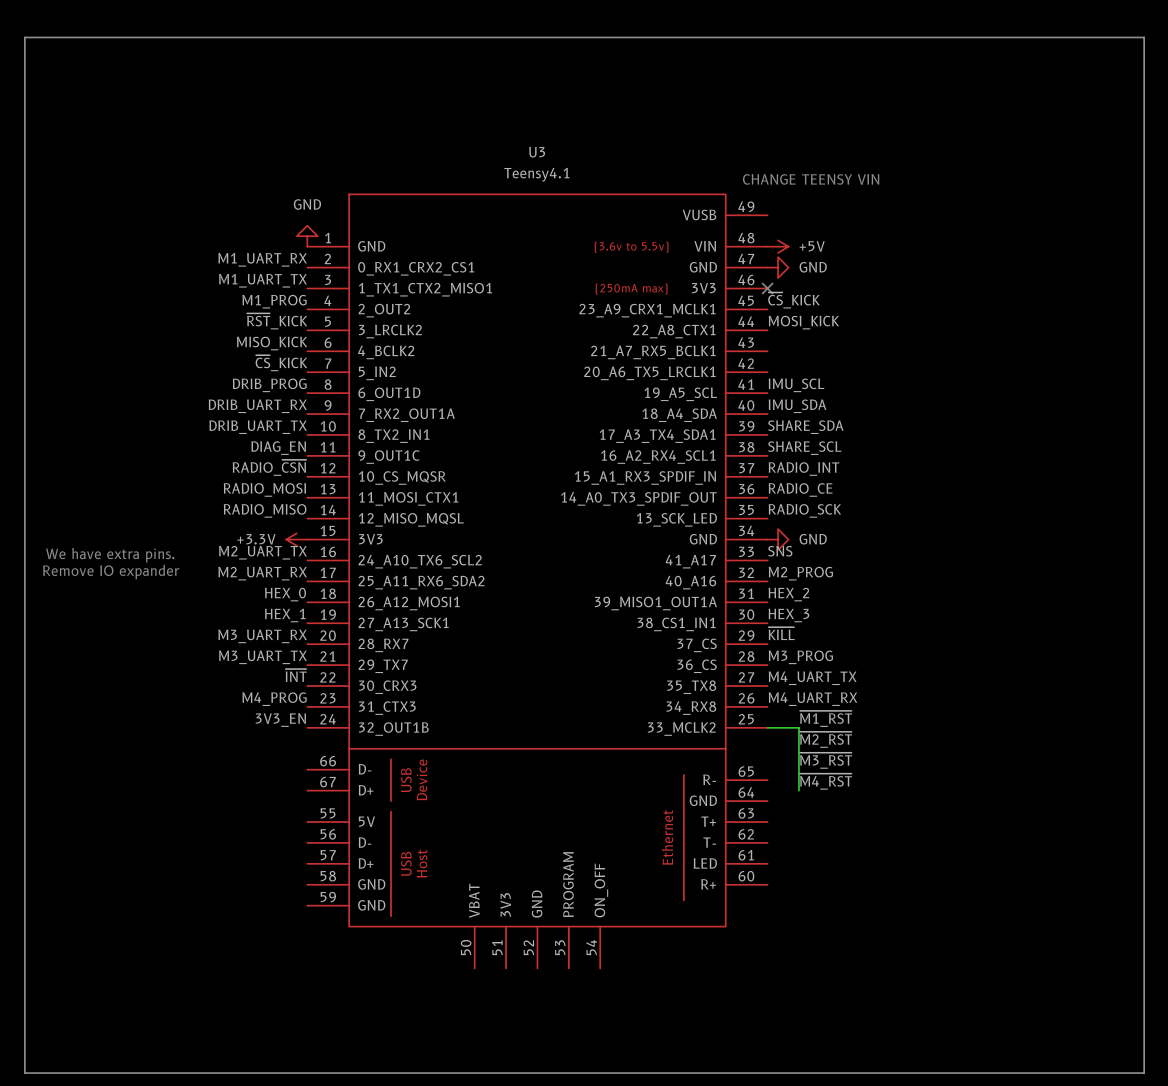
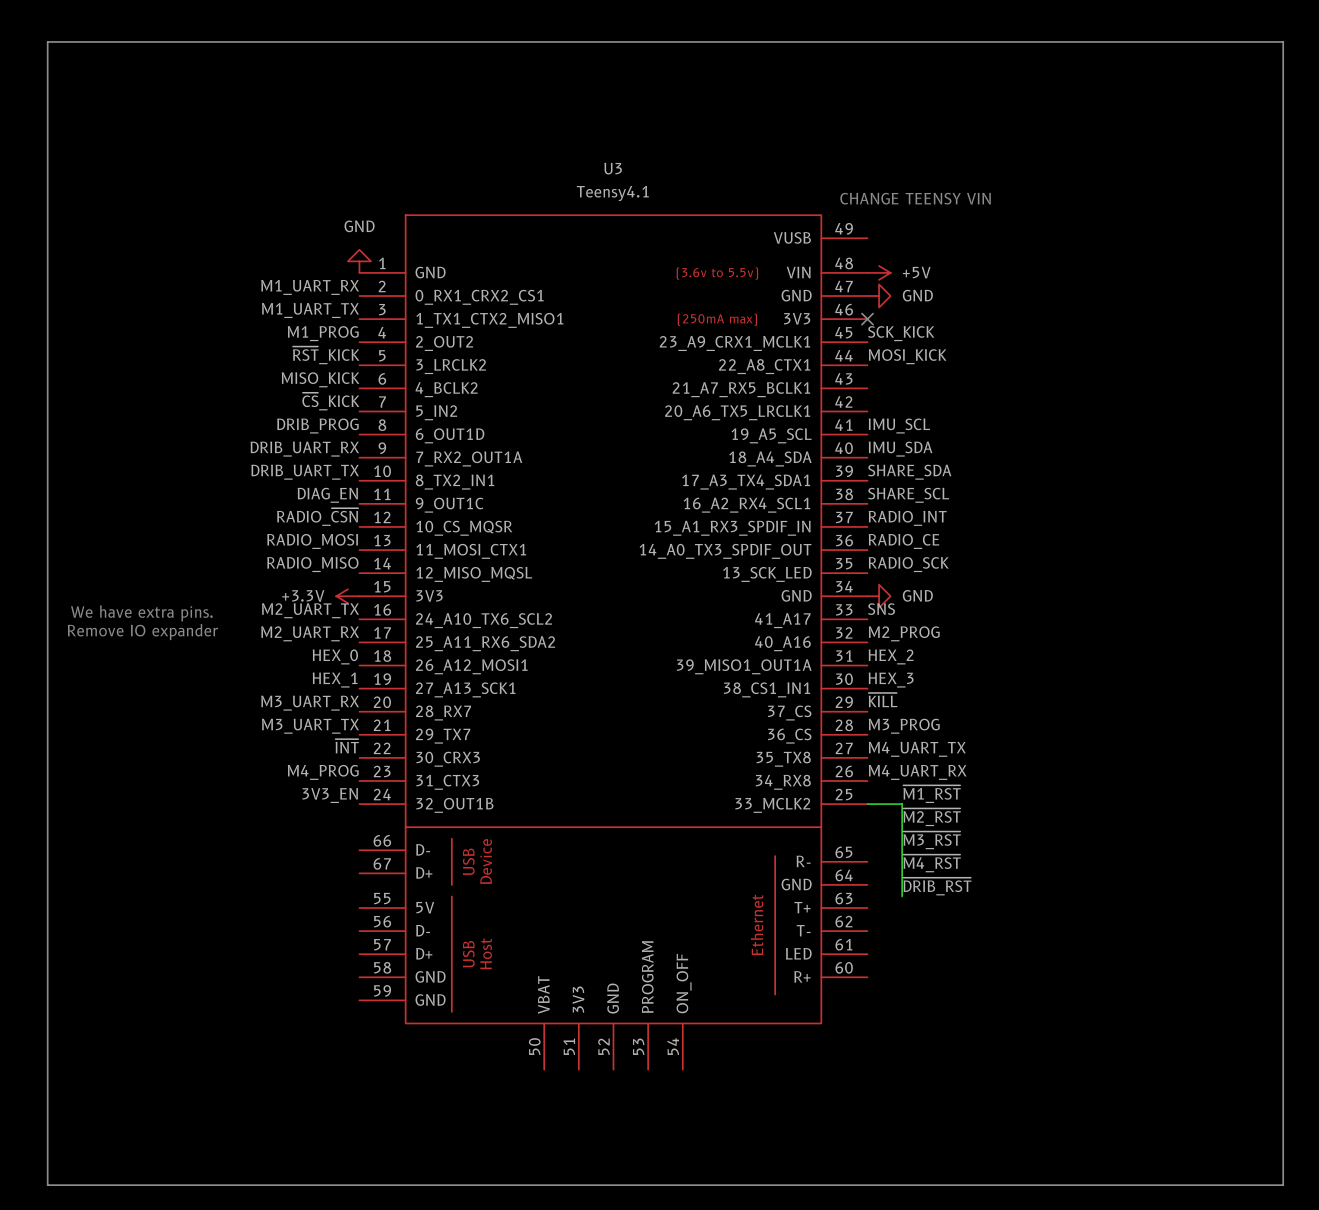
label: ~{CS}_KICK (794, 300) -> SCK_KICK (901, 333)
wire: none -> (902, 873) (902, 896)
label: none -> ~{DRIB_RST} (937, 886)

